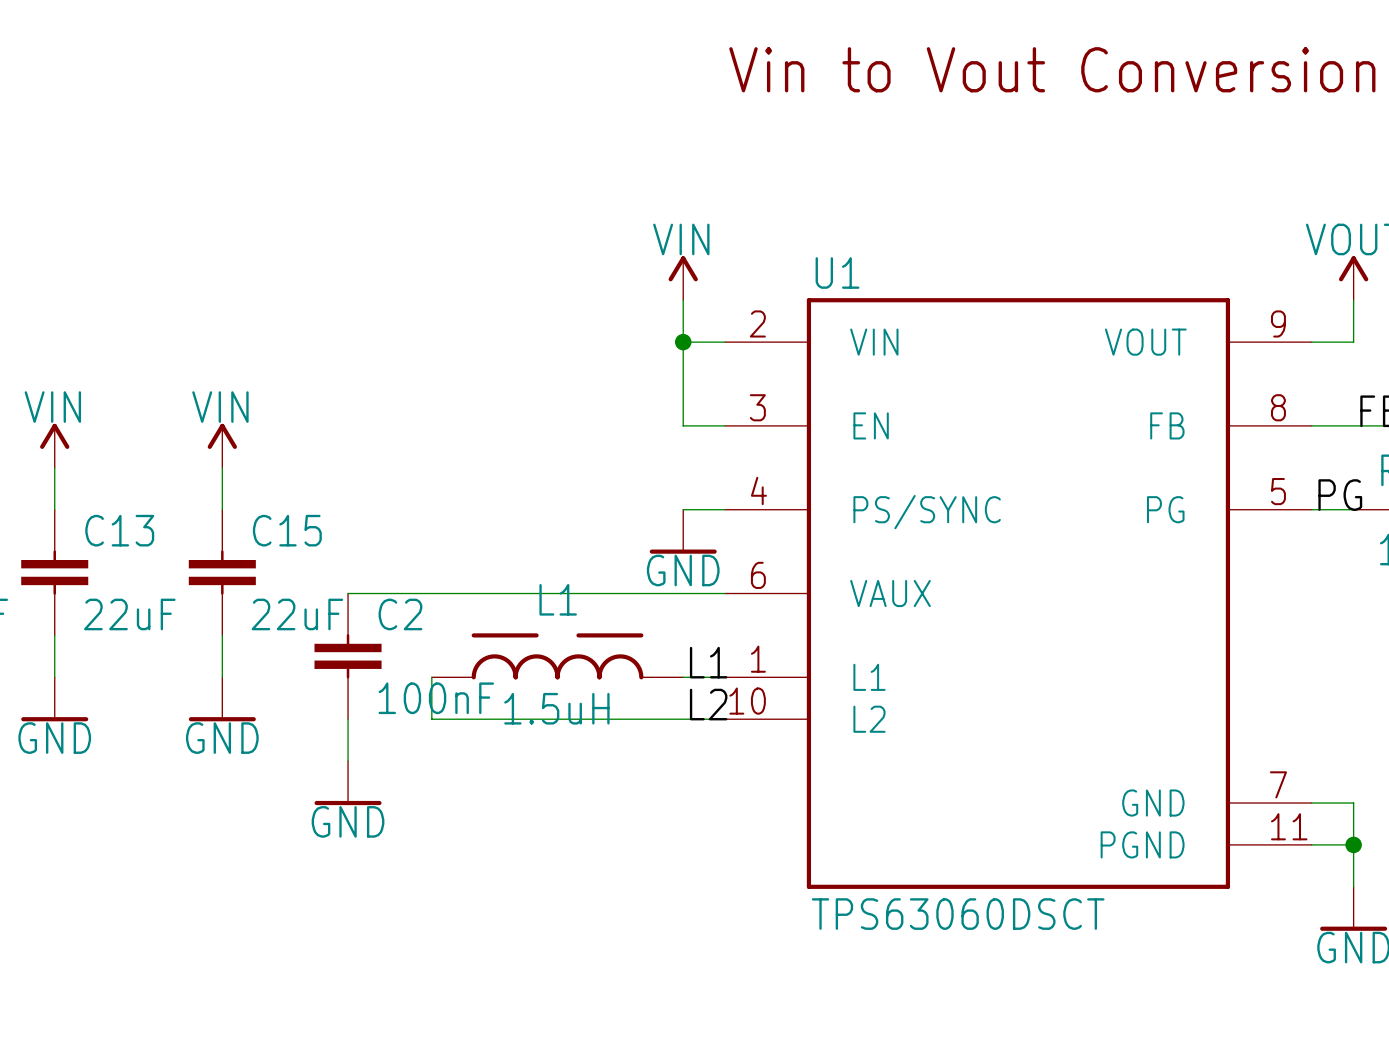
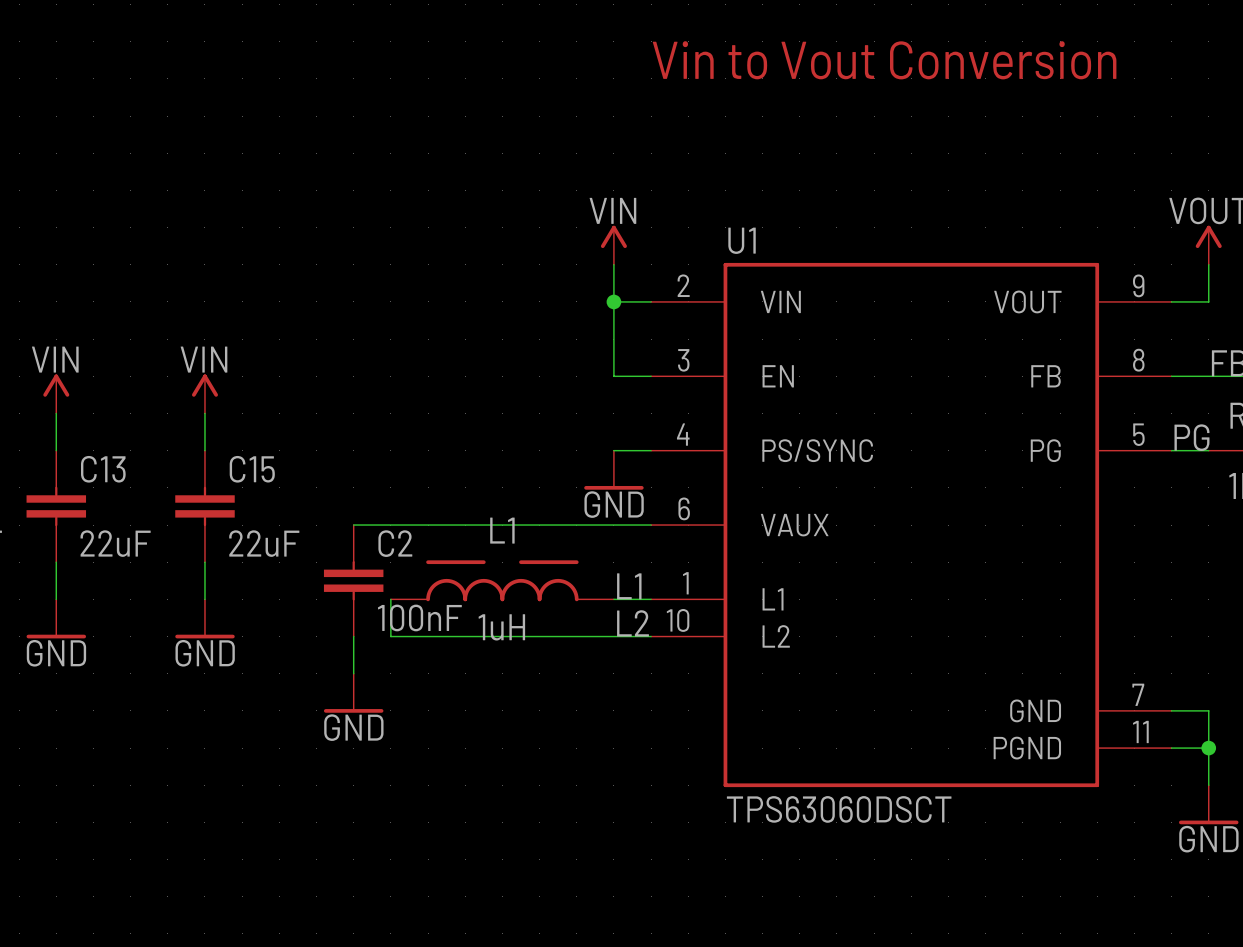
wire: (348, 593) (389, 593) -> none
C2 position: (348, 656) -> (353, 580)
L1 value: 1.5uH (556, 708) -> 1uH (501, 627)
wire: (348, 719) (348, 761) -> (353, 636) (353, 673)
power symbol position: GND (348, 783) -> GND (353, 693)

